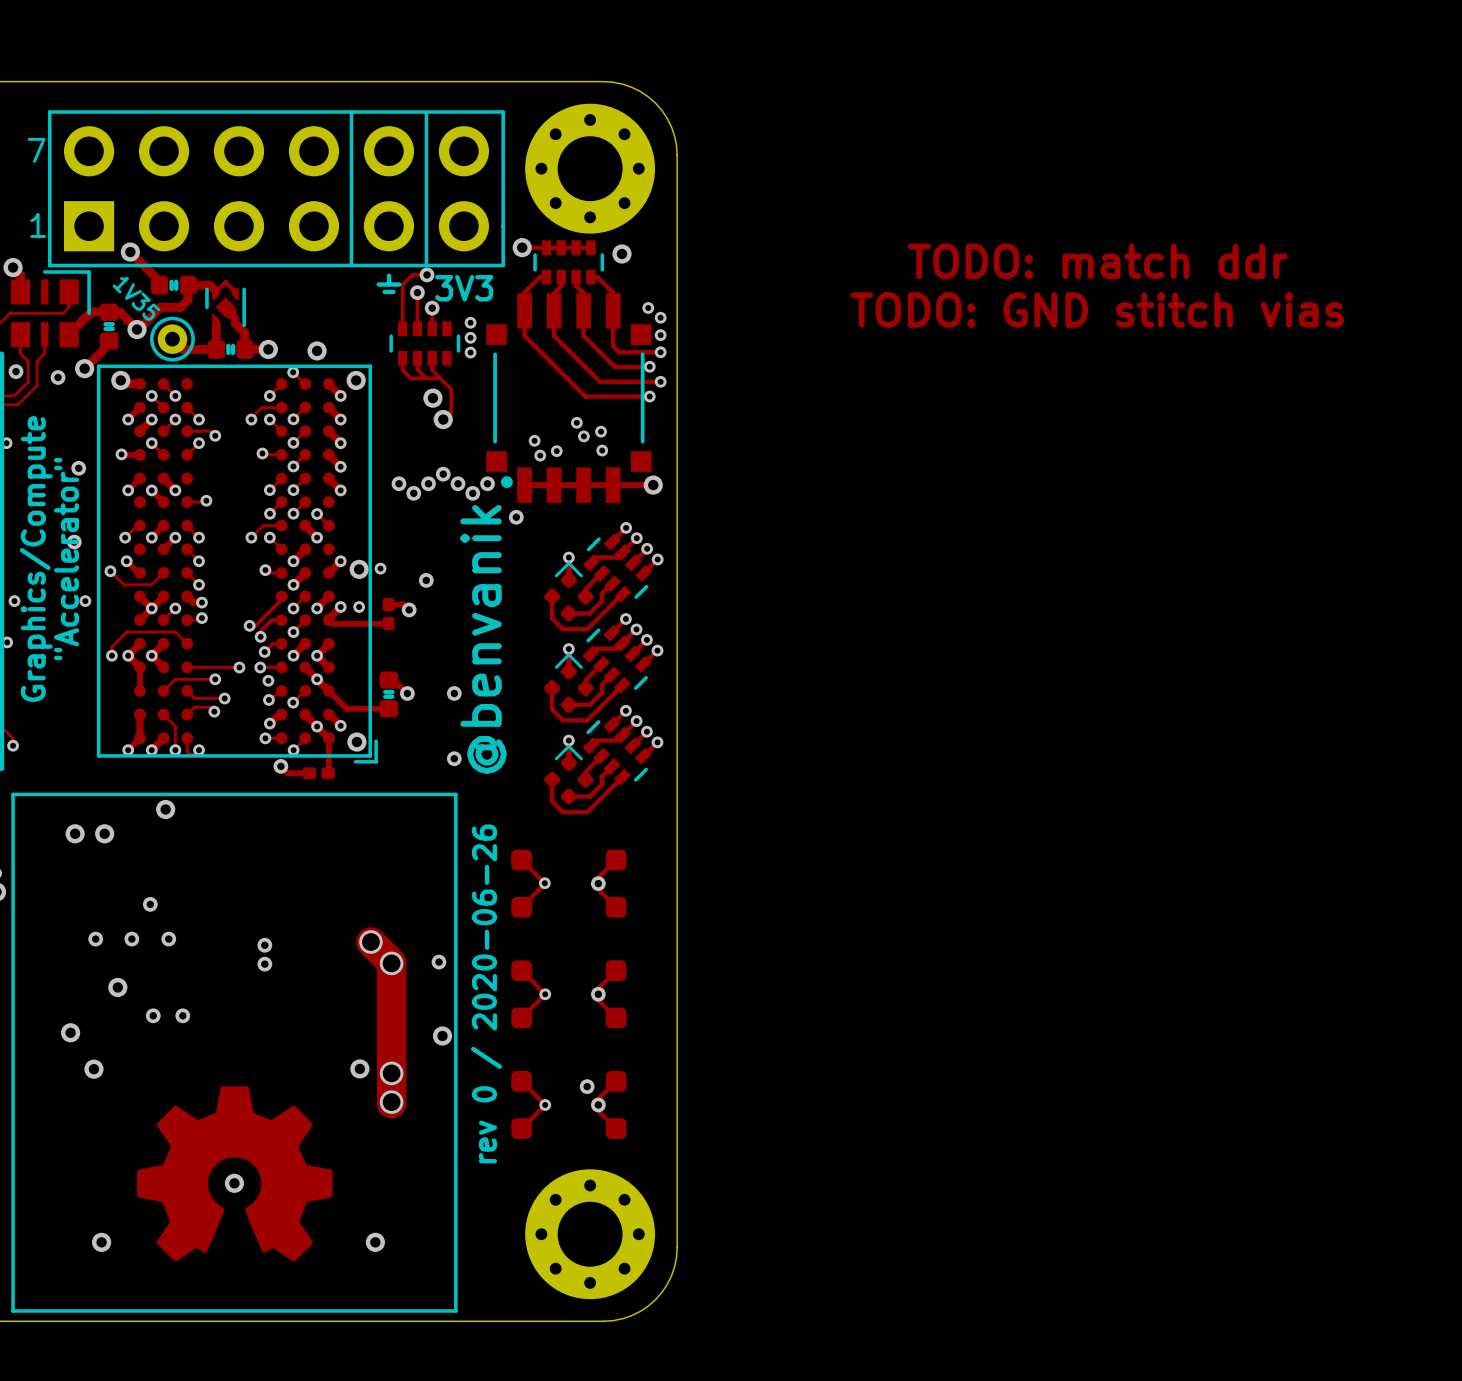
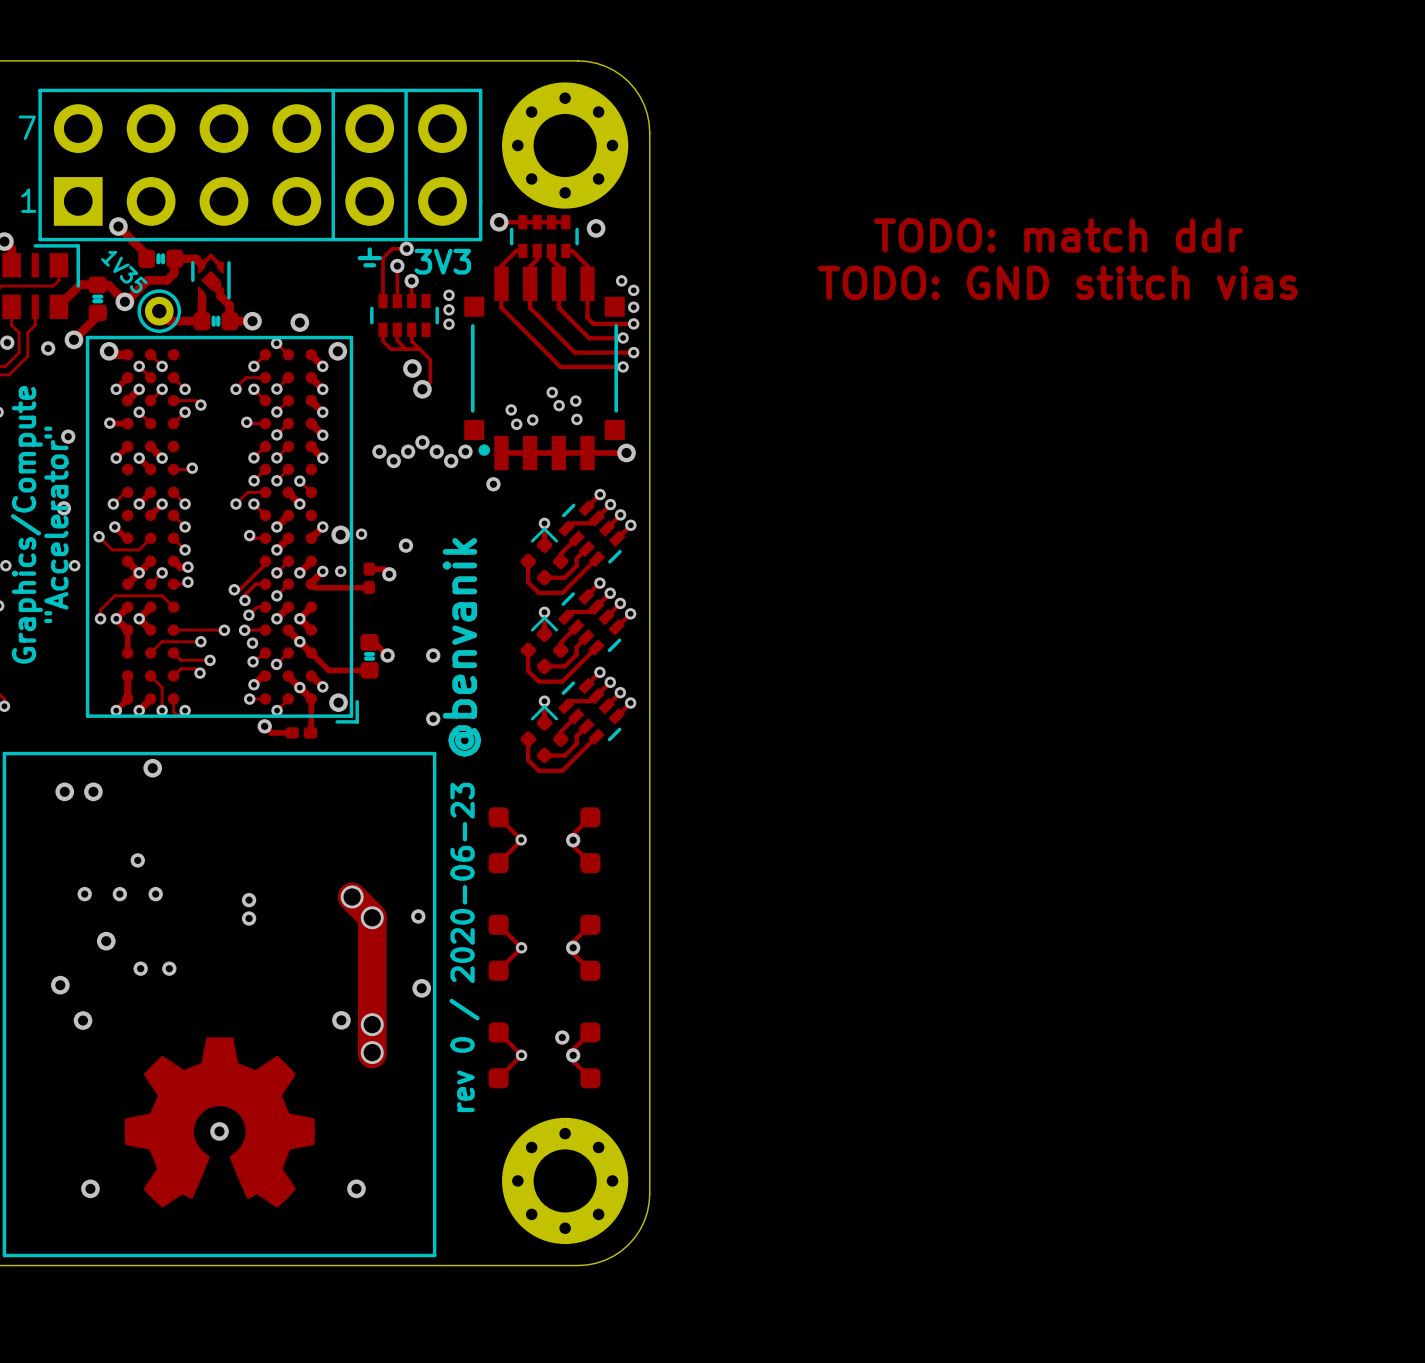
text: @benvanik (483, 639) -> none
text: none -> @benvanik (462, 647)
text: rev 0 / 2020-06-26 (486, 993) -> rev 0 / 2020-06-23 (464, 947)

